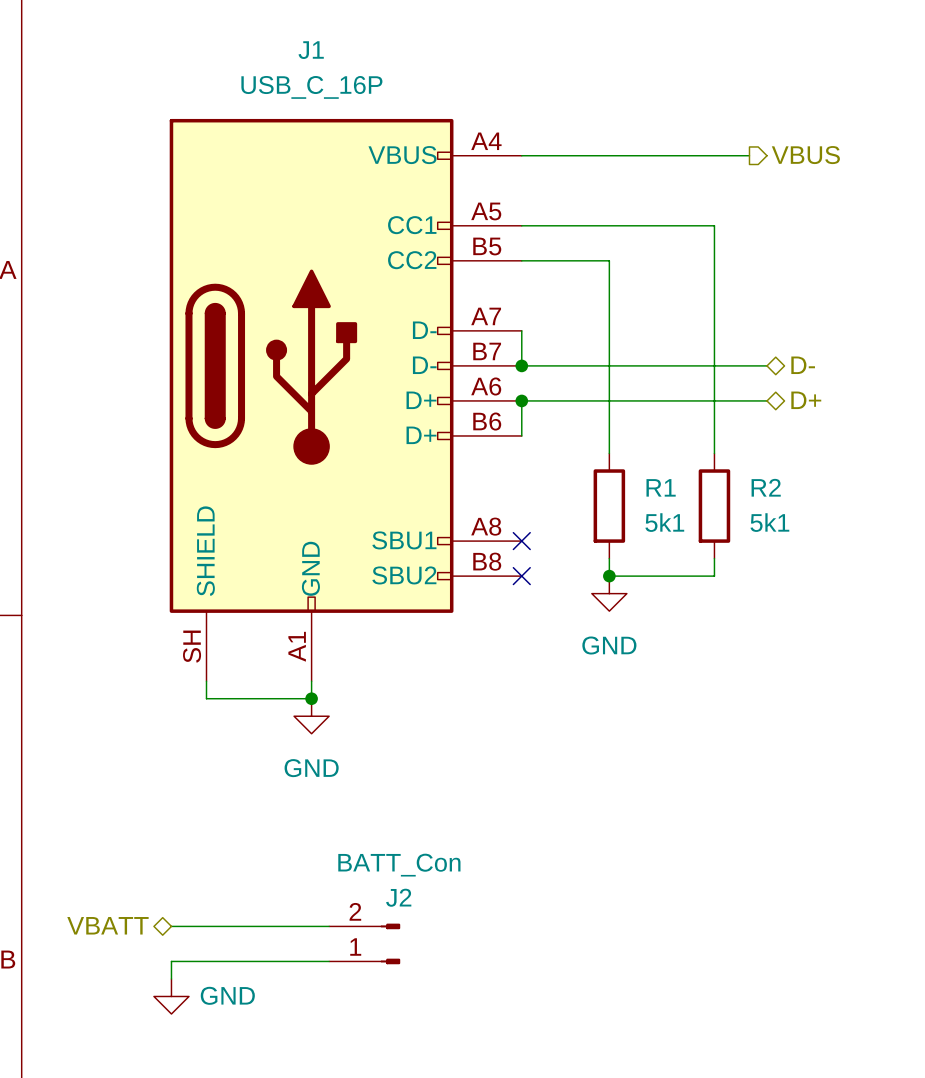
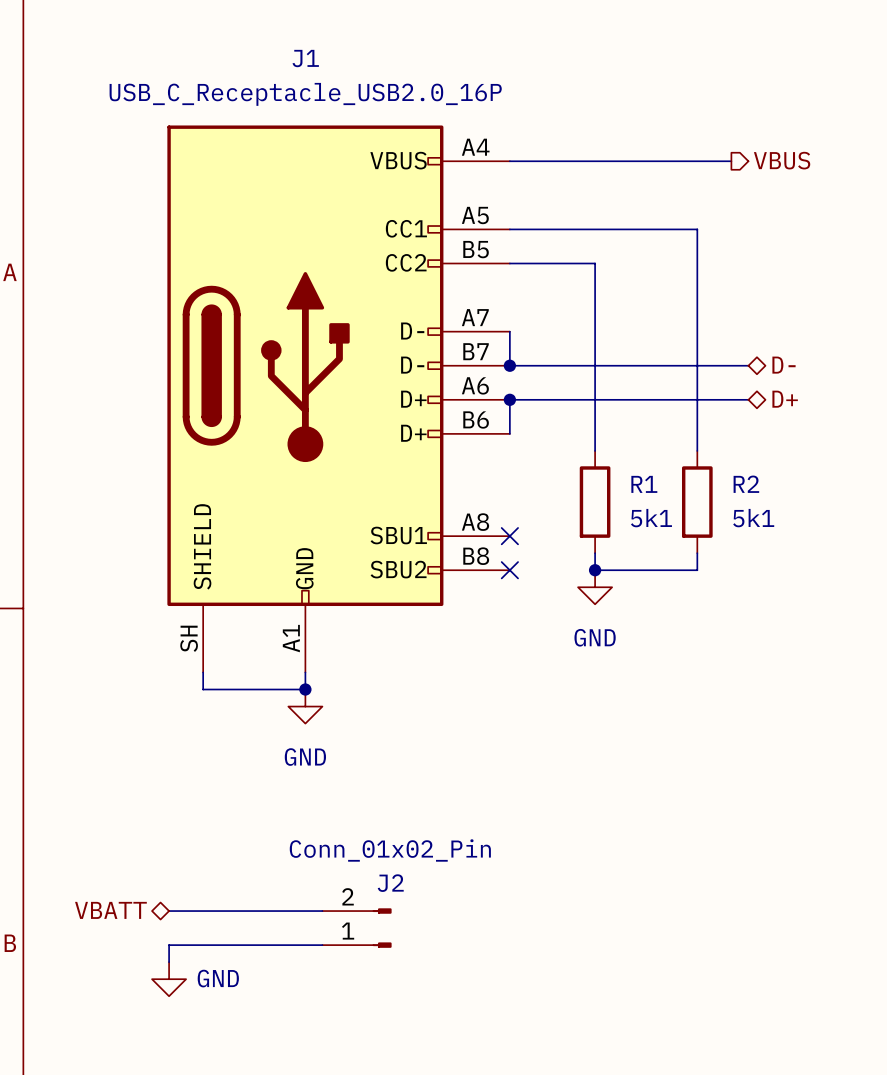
J1 value: USB_C_16P (311, 87) -> USB_C_Receptacle_USB2.0_16P (305, 94)
J2 value: BATT_Con (399, 865) -> Conn_01x02_Pin (390, 850)

